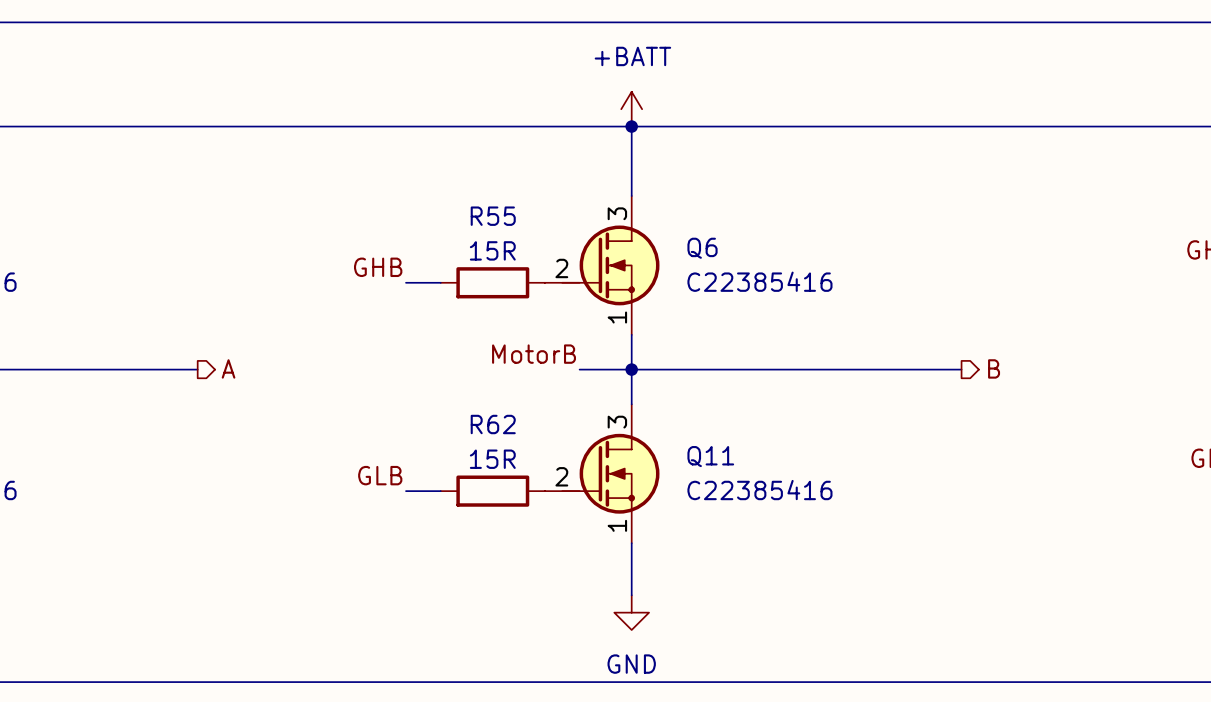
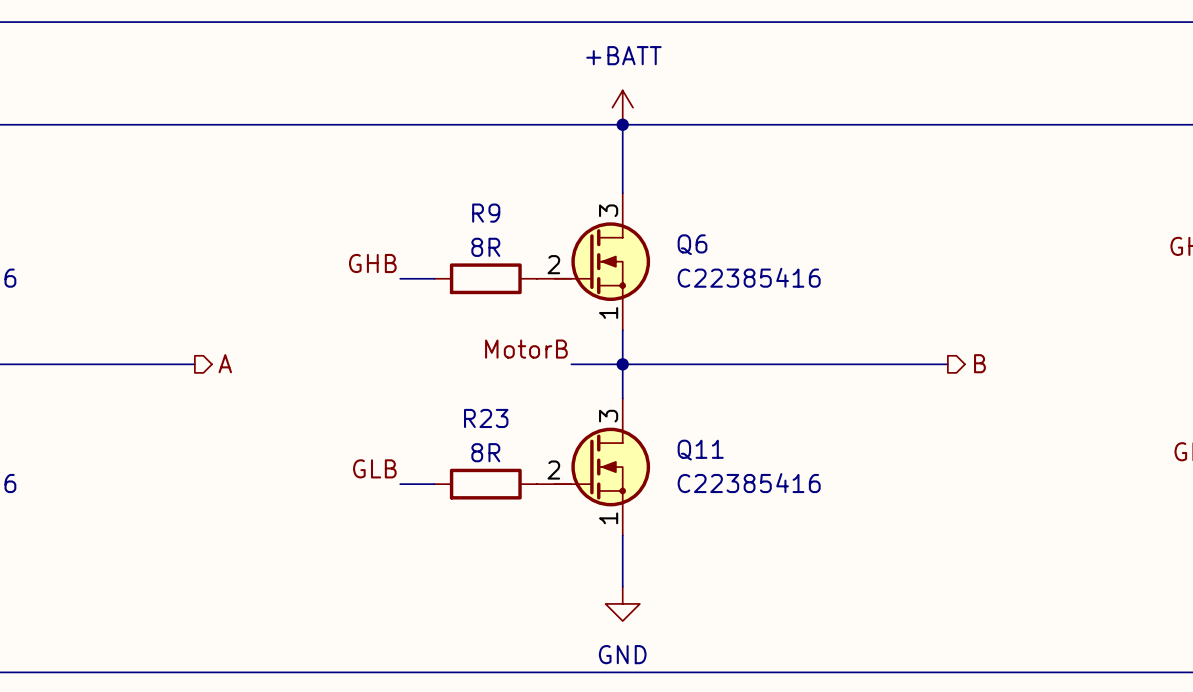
R55 name: R55 (493, 216) -> R9 (486, 213)
R55 value: 15R (492, 250) -> 8R (485, 247)
R62 name: R62 (493, 424) -> R23 (486, 418)
R62 value: 15R (492, 459) -> 8R (485, 452)

